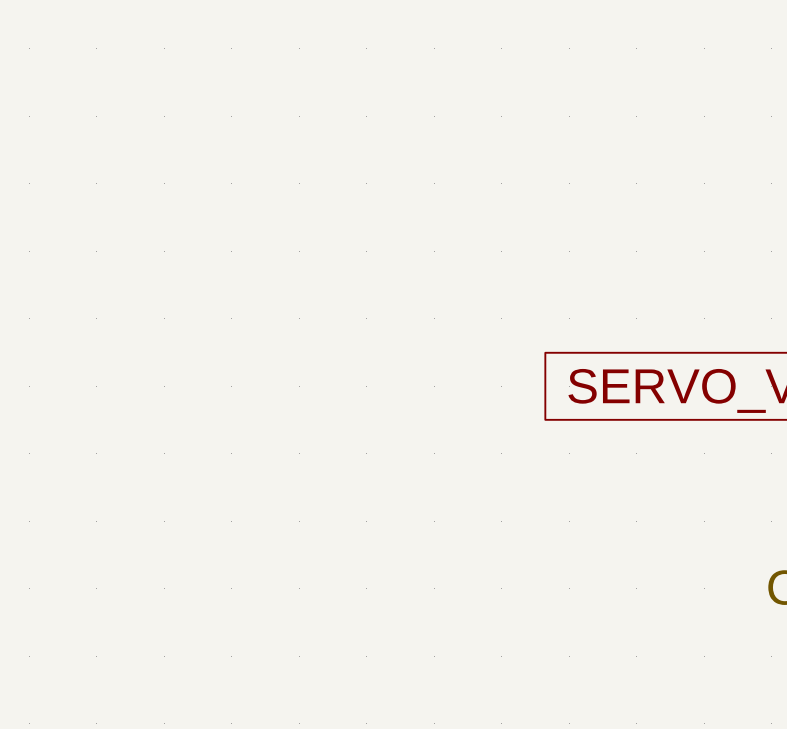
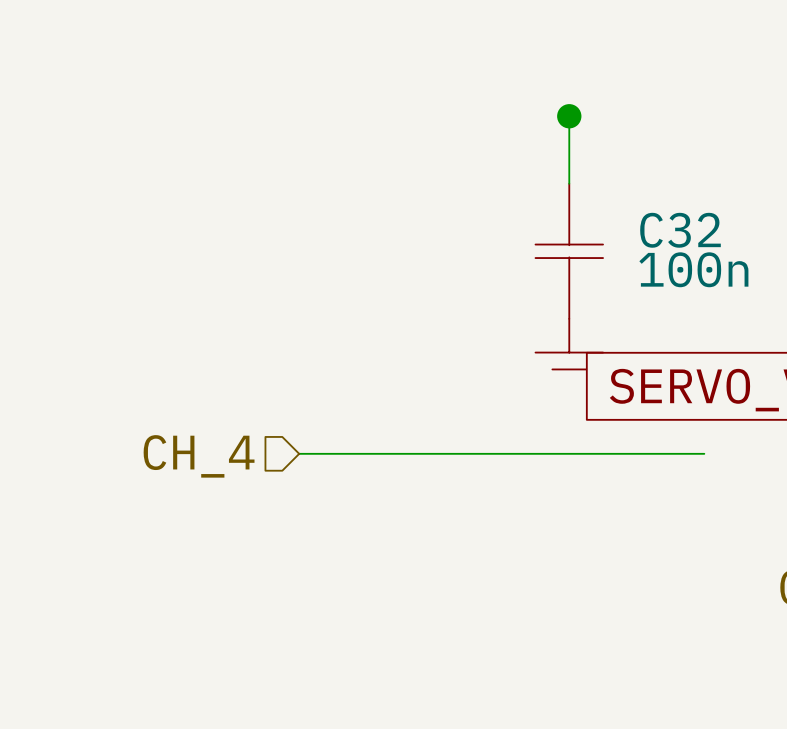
wire: none -> (569, 116) (569, 183)
junction: none -> (569, 116)
C32: none -> 100n (569, 251)
power symbol: none -> (569, 352)
wire: none -> (299, 453) (704, 453)
hierarchical label: none -> CH_4 (199, 456)

